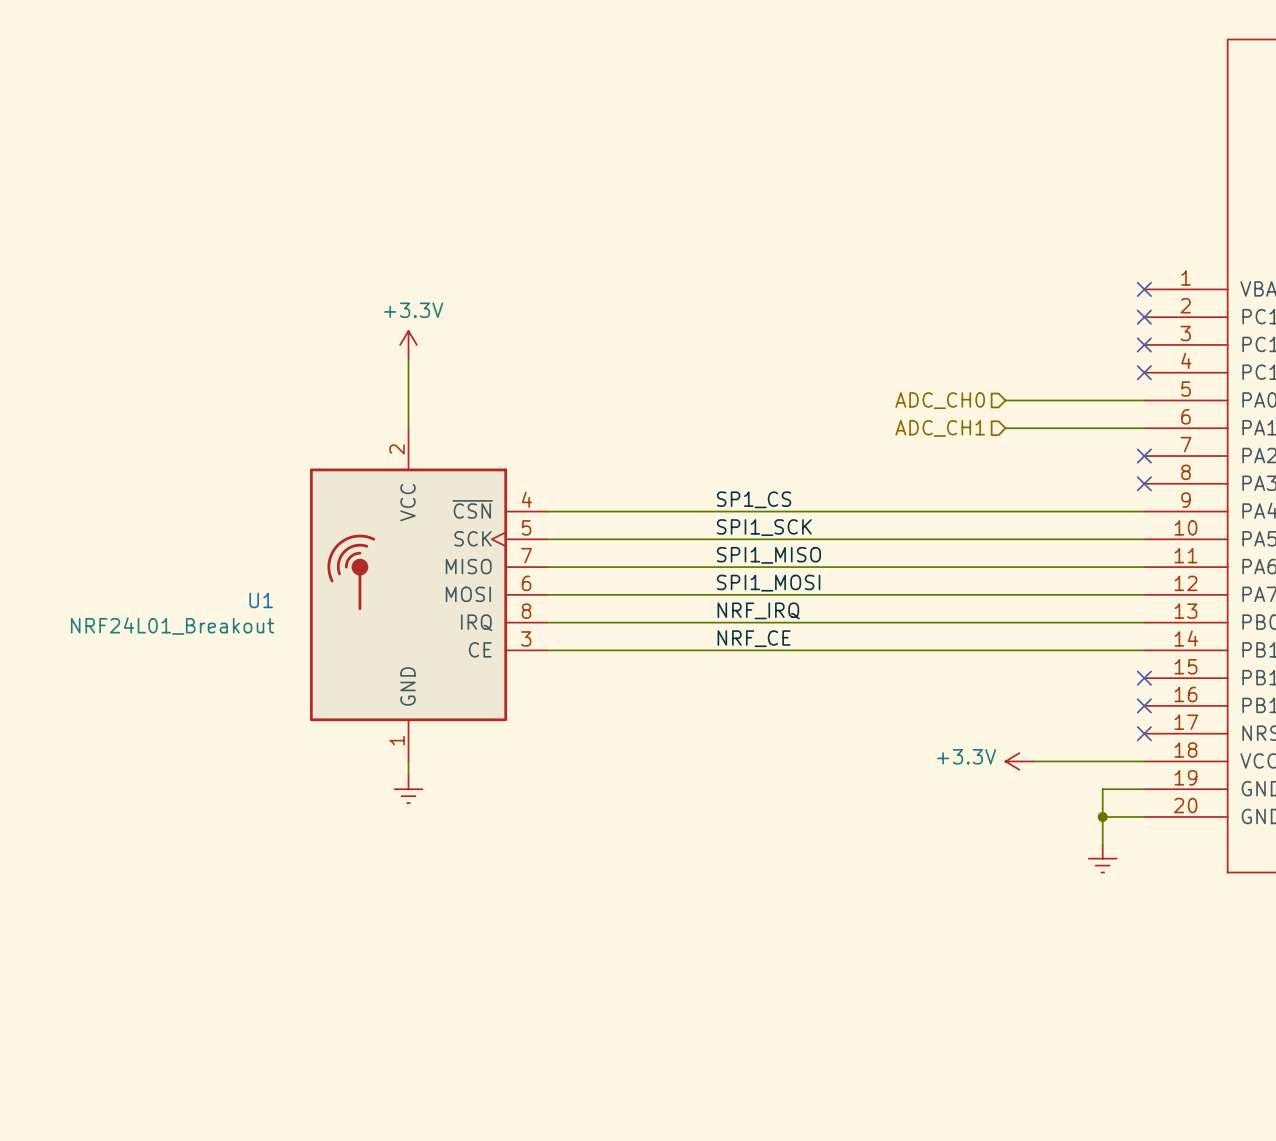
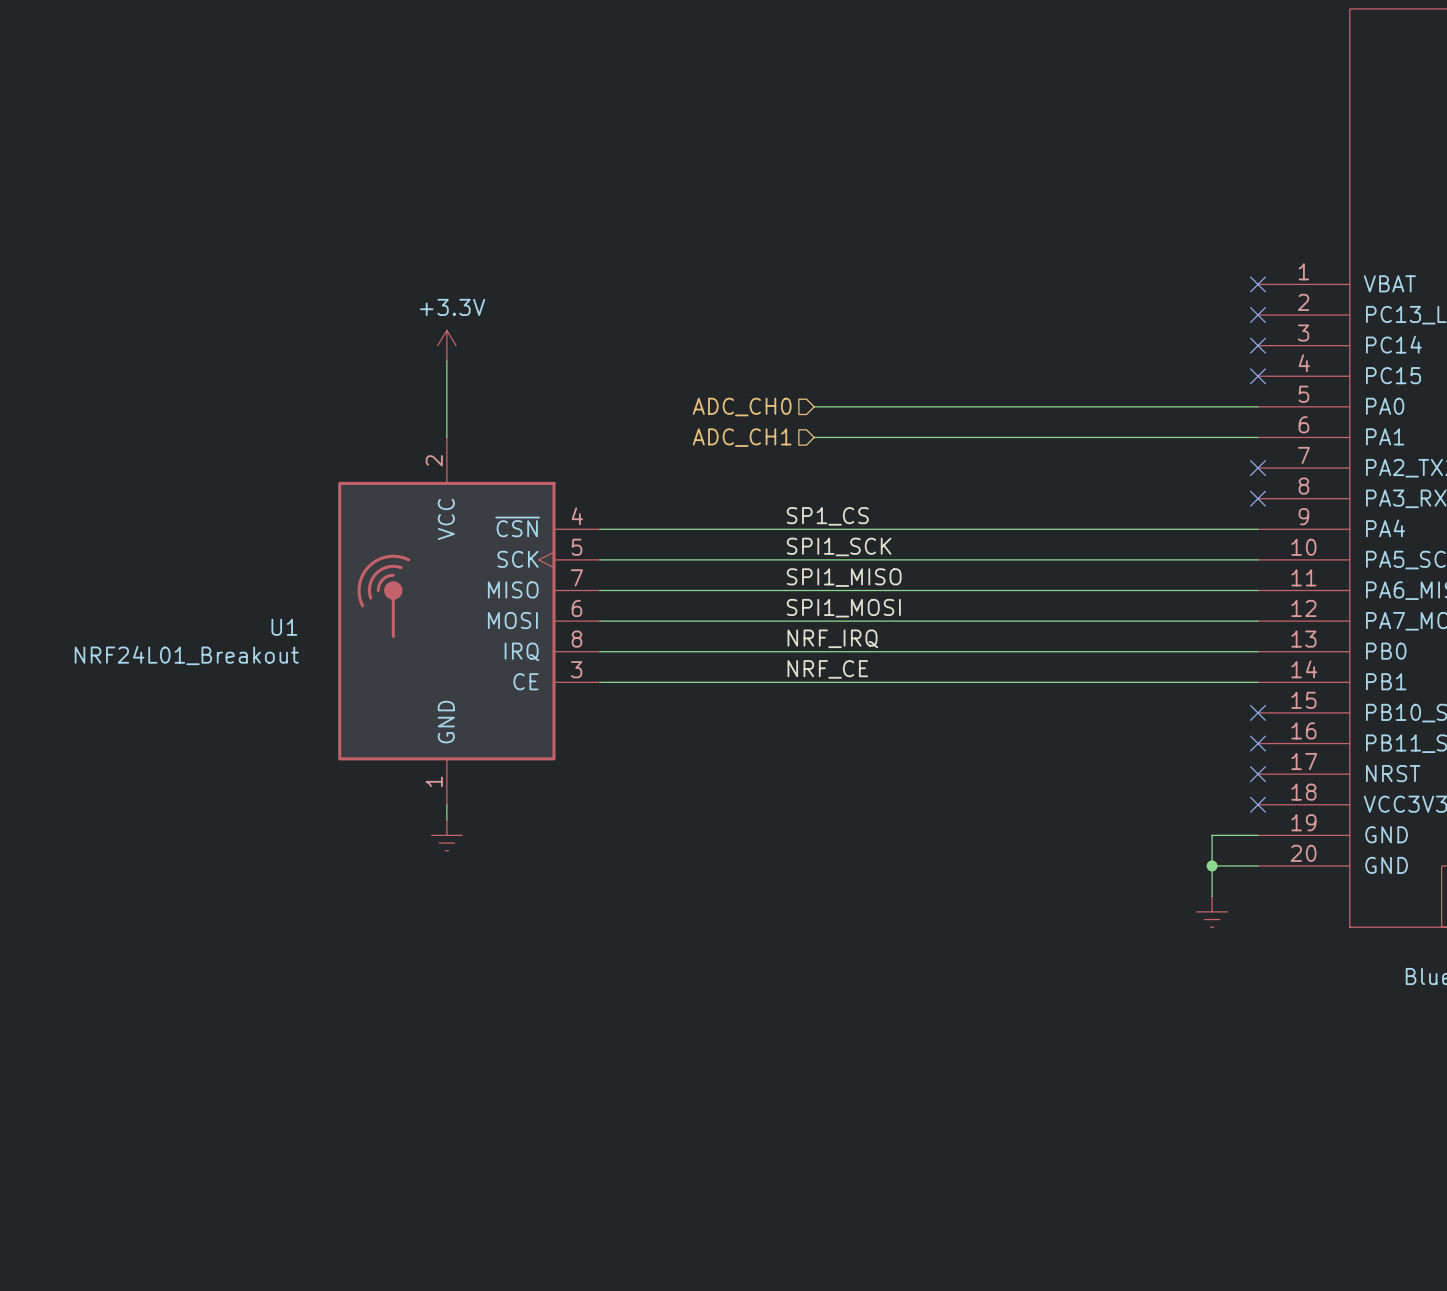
wire: none -> (814, 406) (1104, 406)
hierarchical label position: ADC_CH0 (940, 400) -> ADC_CH0 (742, 407)
wire: none -> (814, 437) (1104, 437)
hierarchical label position: ADC_CH1 (940, 428) -> ADC_CH1 (742, 437)
power symbol: +3.3V (1019, 761) -> none
wire: (1033, 761) (1144, 761) -> none
no-connect mark: none -> (1258, 804)

